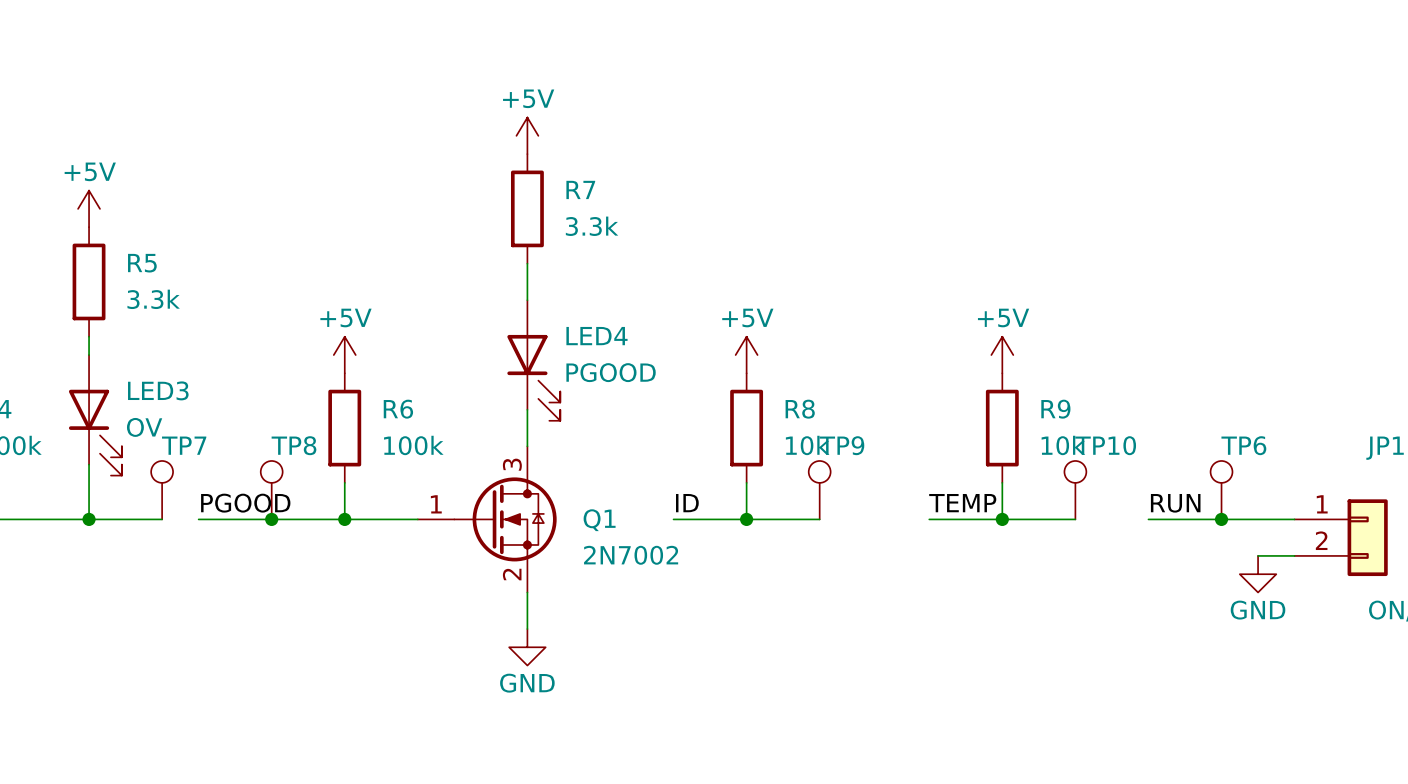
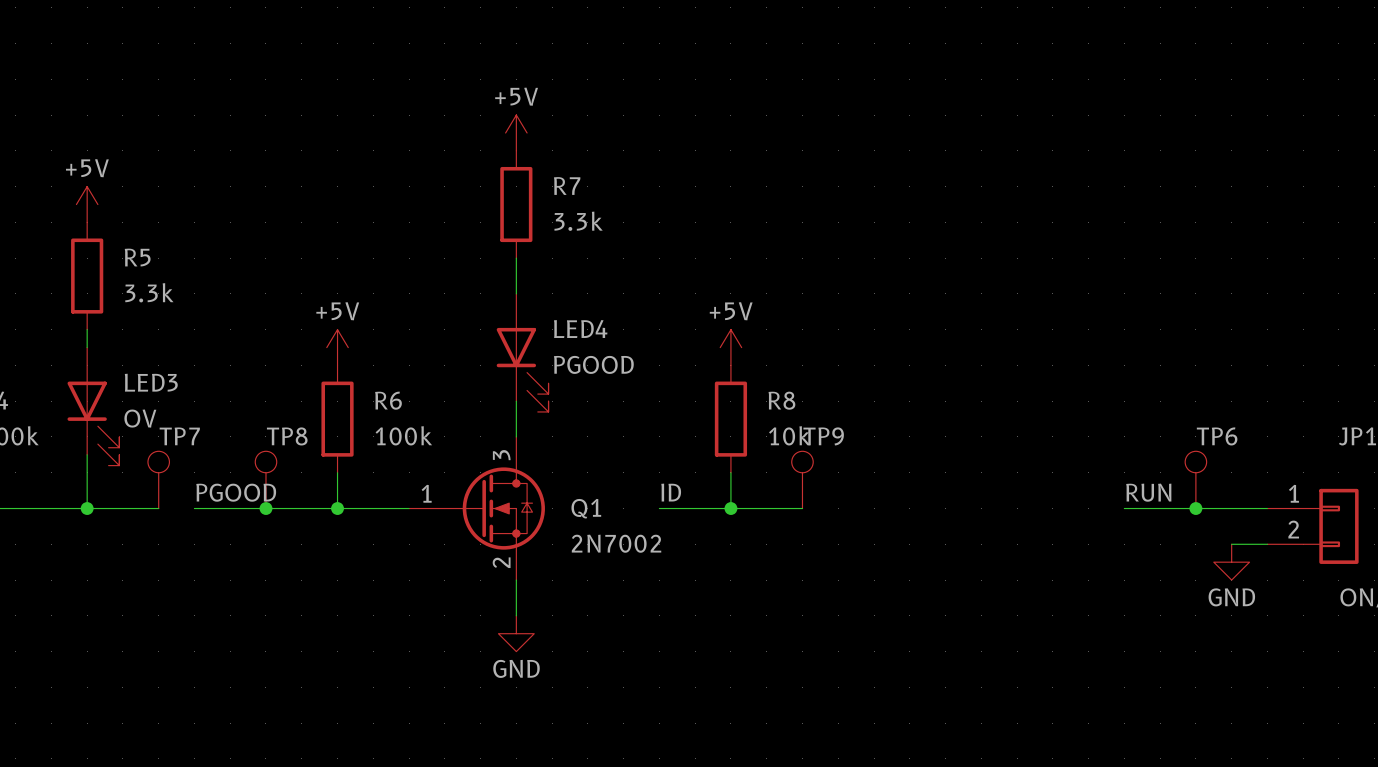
power symbol: +5V (1002, 355) -> none
R9: 10k (1002, 428) -> none
wire: (1002, 482) (1002, 519) -> none
TP10: (1075, 490) -> none
label: TEMP (962, 503) -> none
wire: (929, 519) (1075, 519) -> none
junction: (1002, 519) -> none

